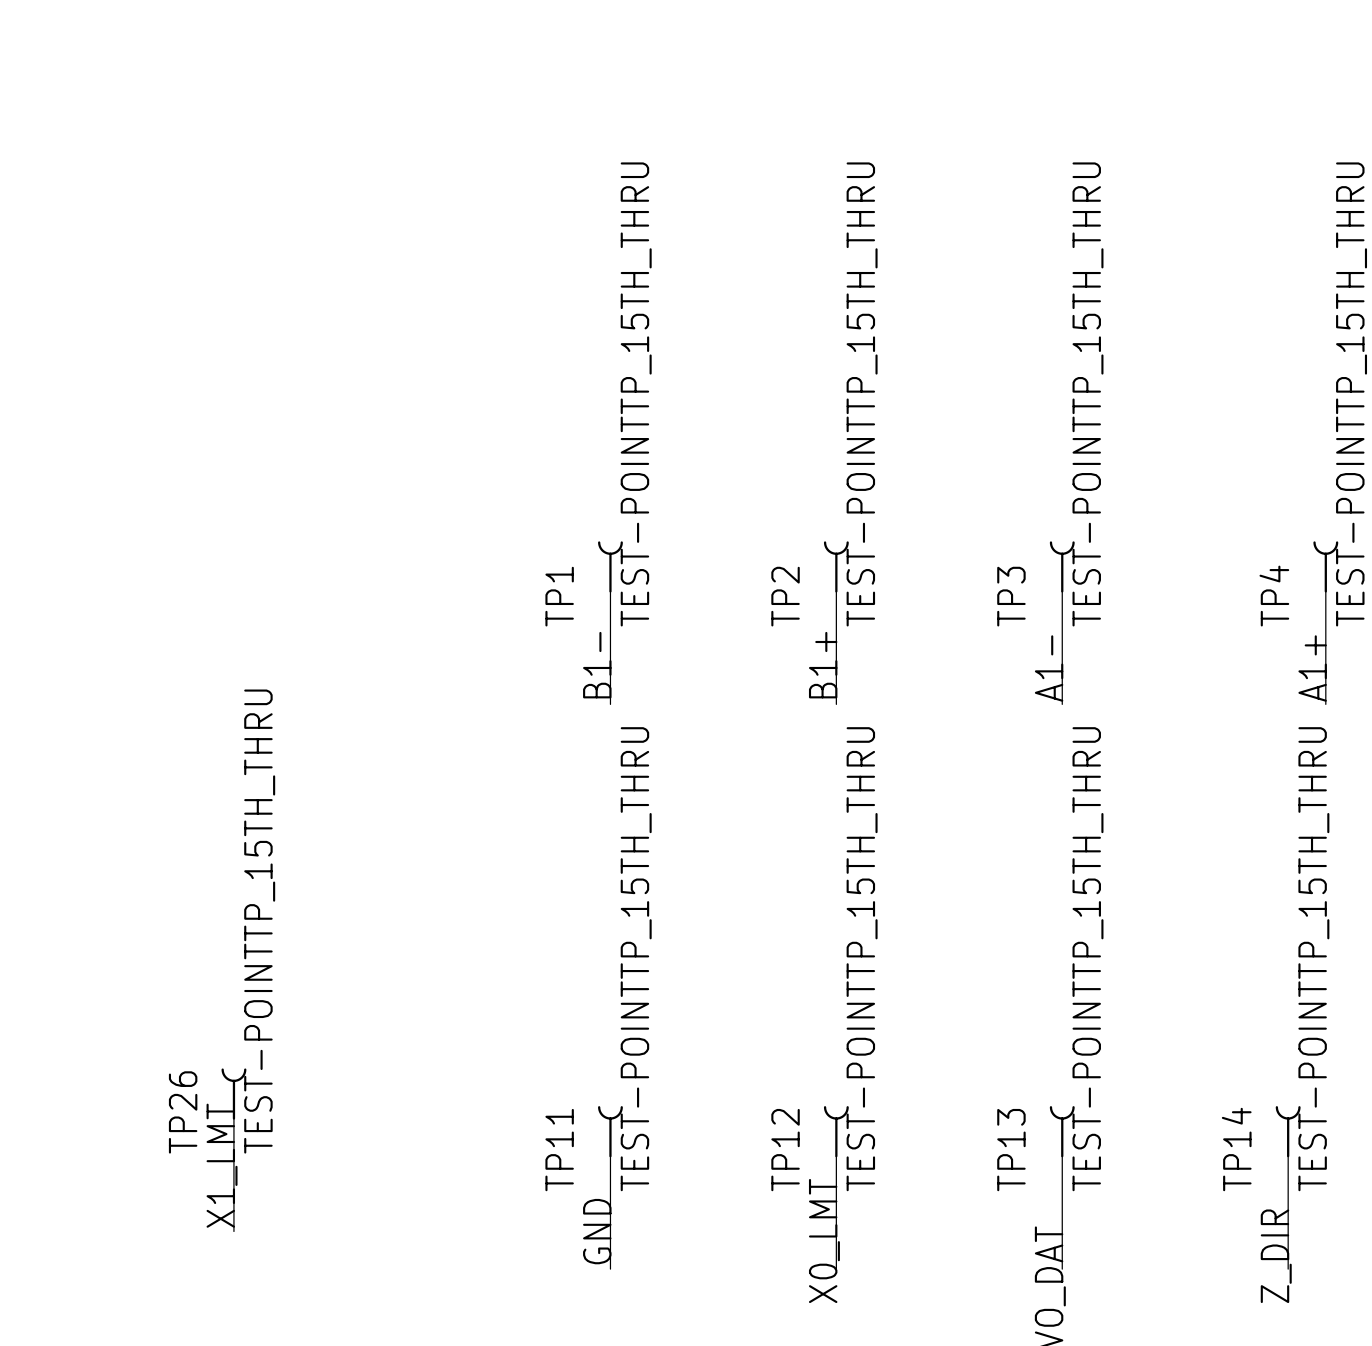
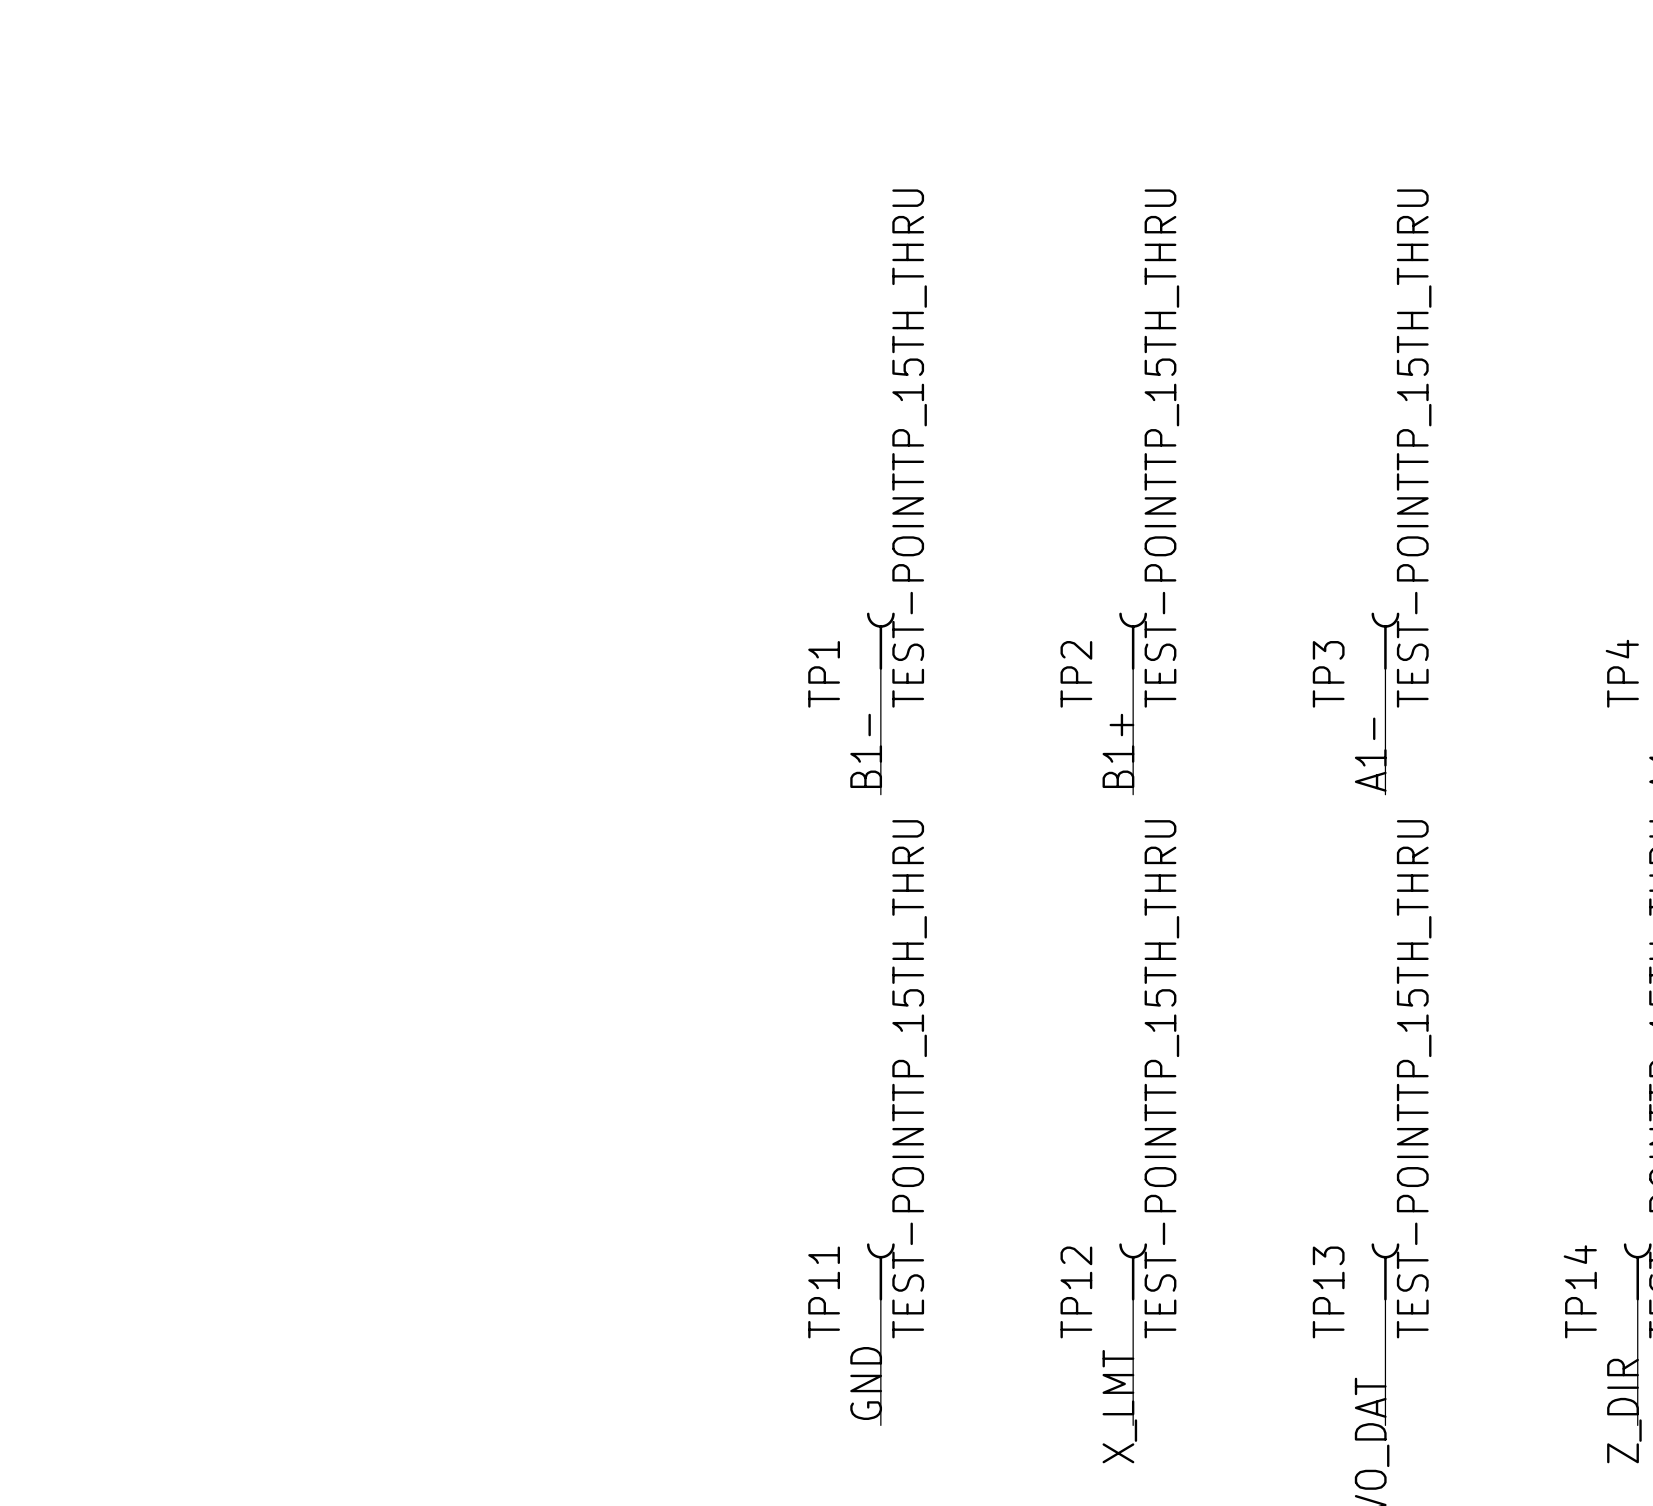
TP26: TEST-POINTTP_15TH_THRU (233, 1094) -> none
wire: (233, 1118) (233, 1231) -> none
label: X1_LMT (222, 1165) -> none
label: X0_LMT (824, 1241) -> X_LMT (1119, 1406)

